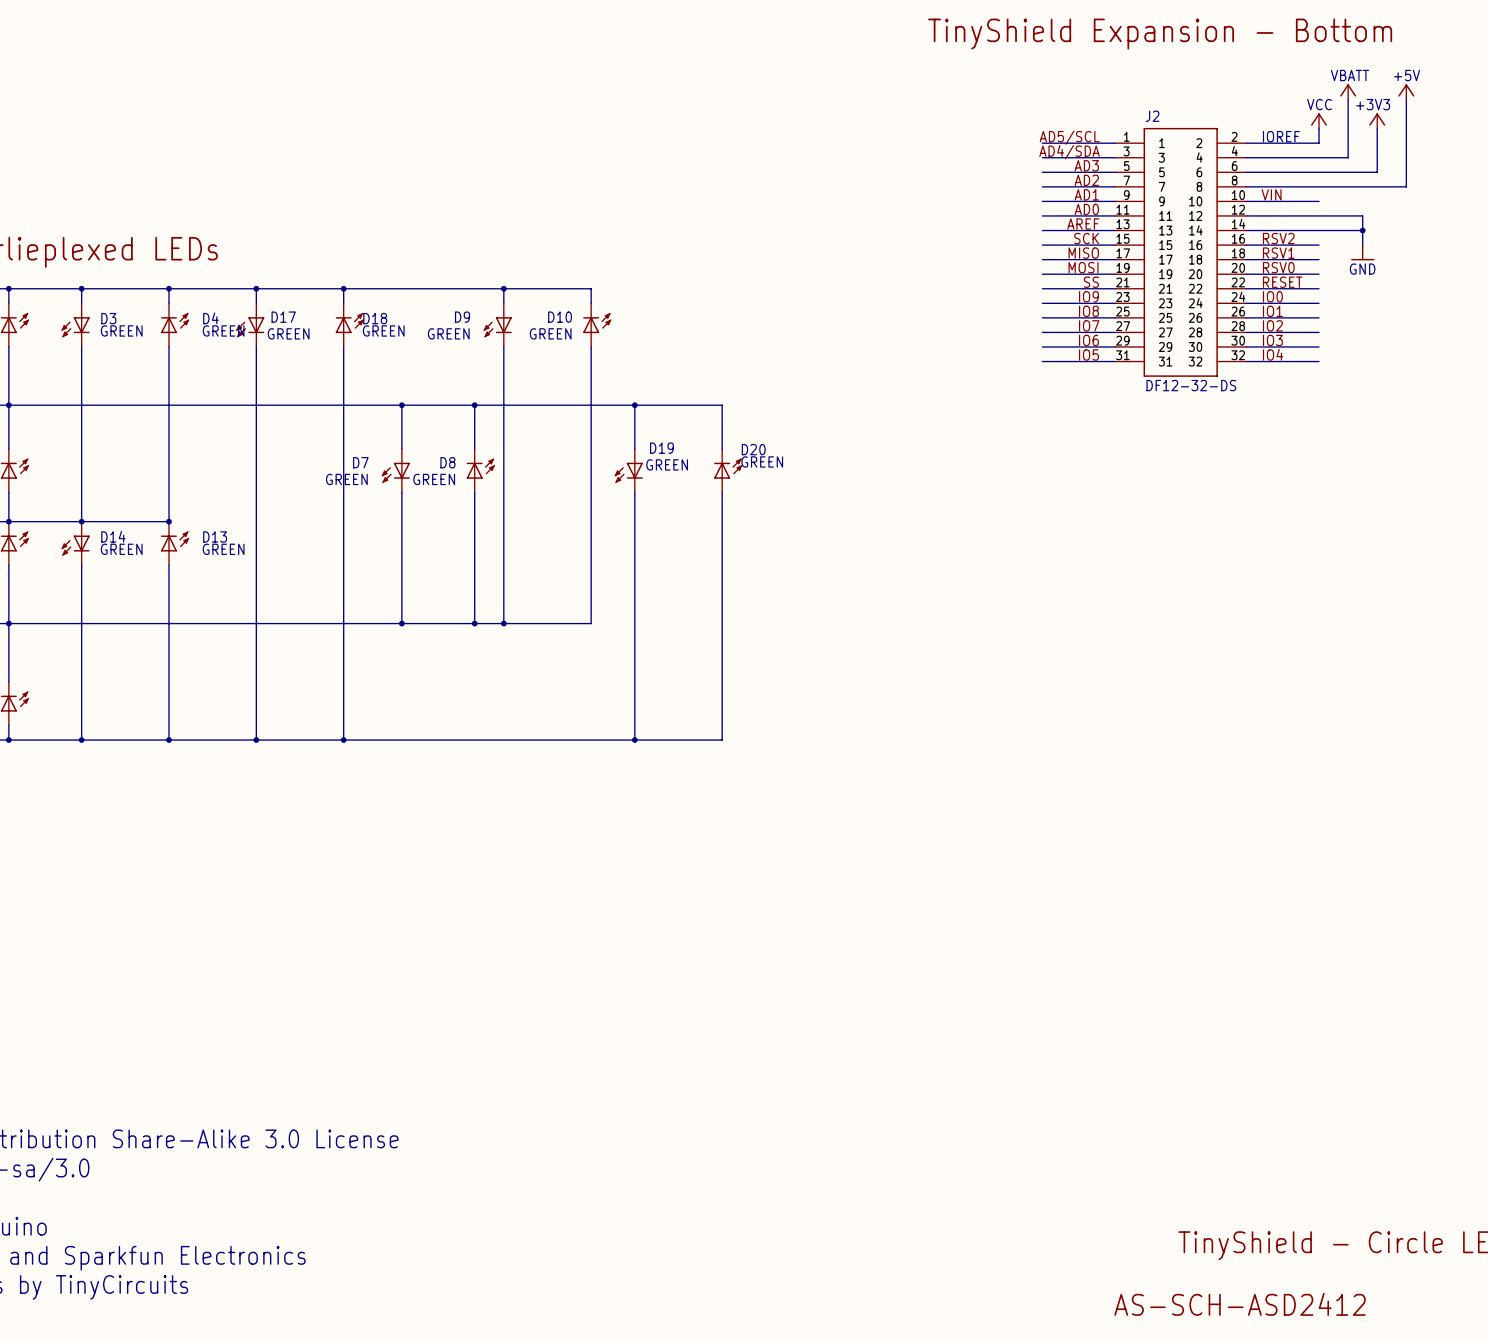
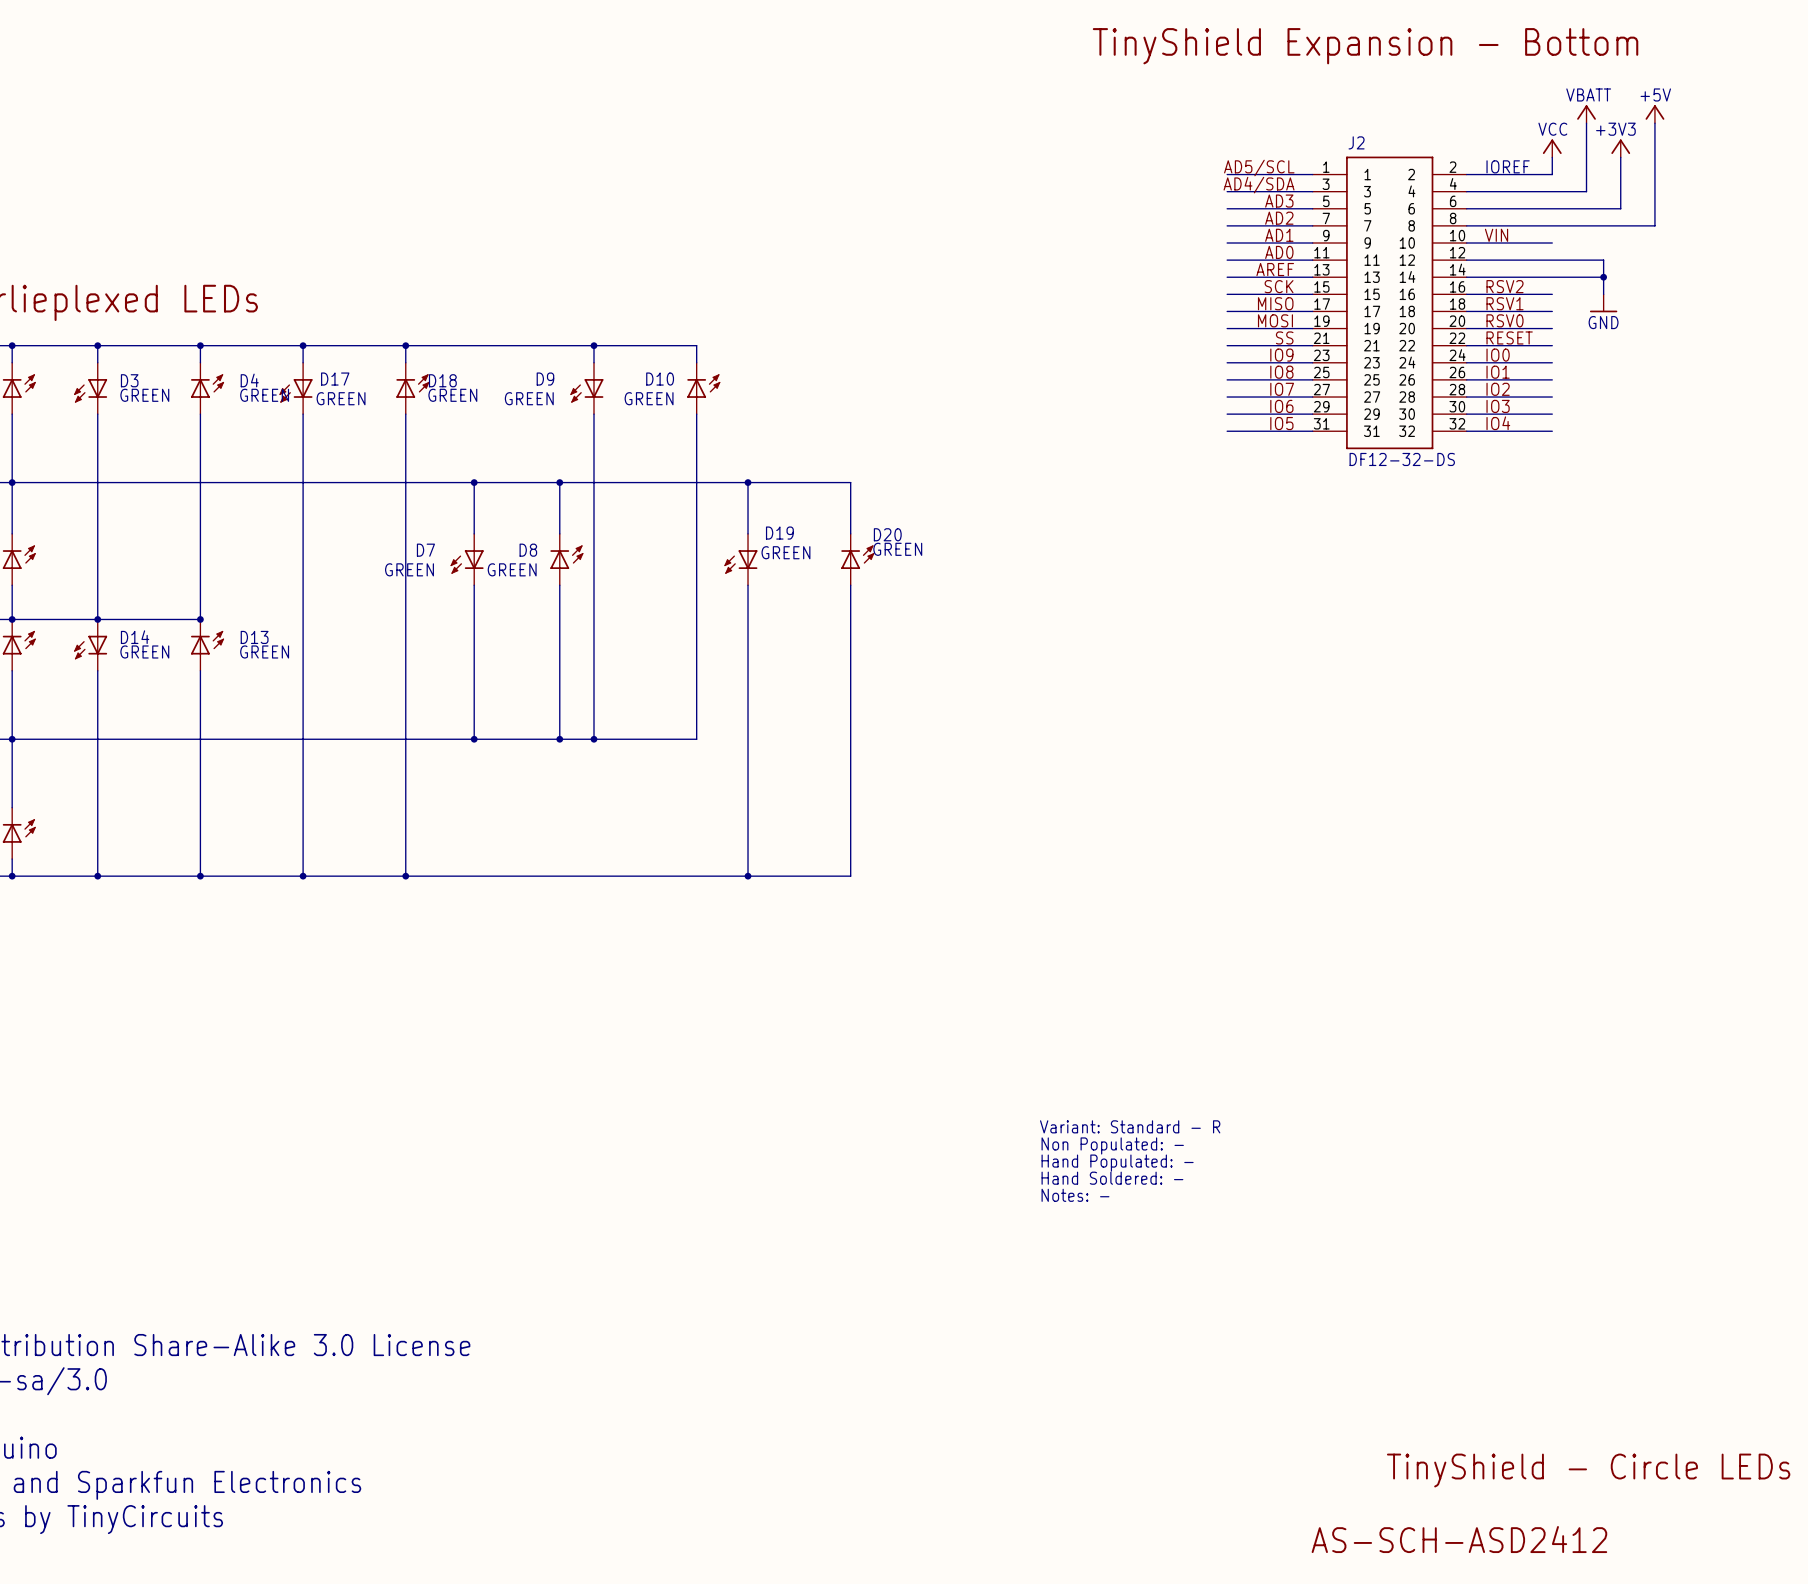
text: none -> Variant: Standard - R (1130, 1126)
text: none -> Non Populated: - (1112, 1145)
text: none -> Hand Populated: - (1117, 1163)
text: none -> Hand Soldered: - (1112, 1178)
text: none -> Notes: - (1075, 1195)

